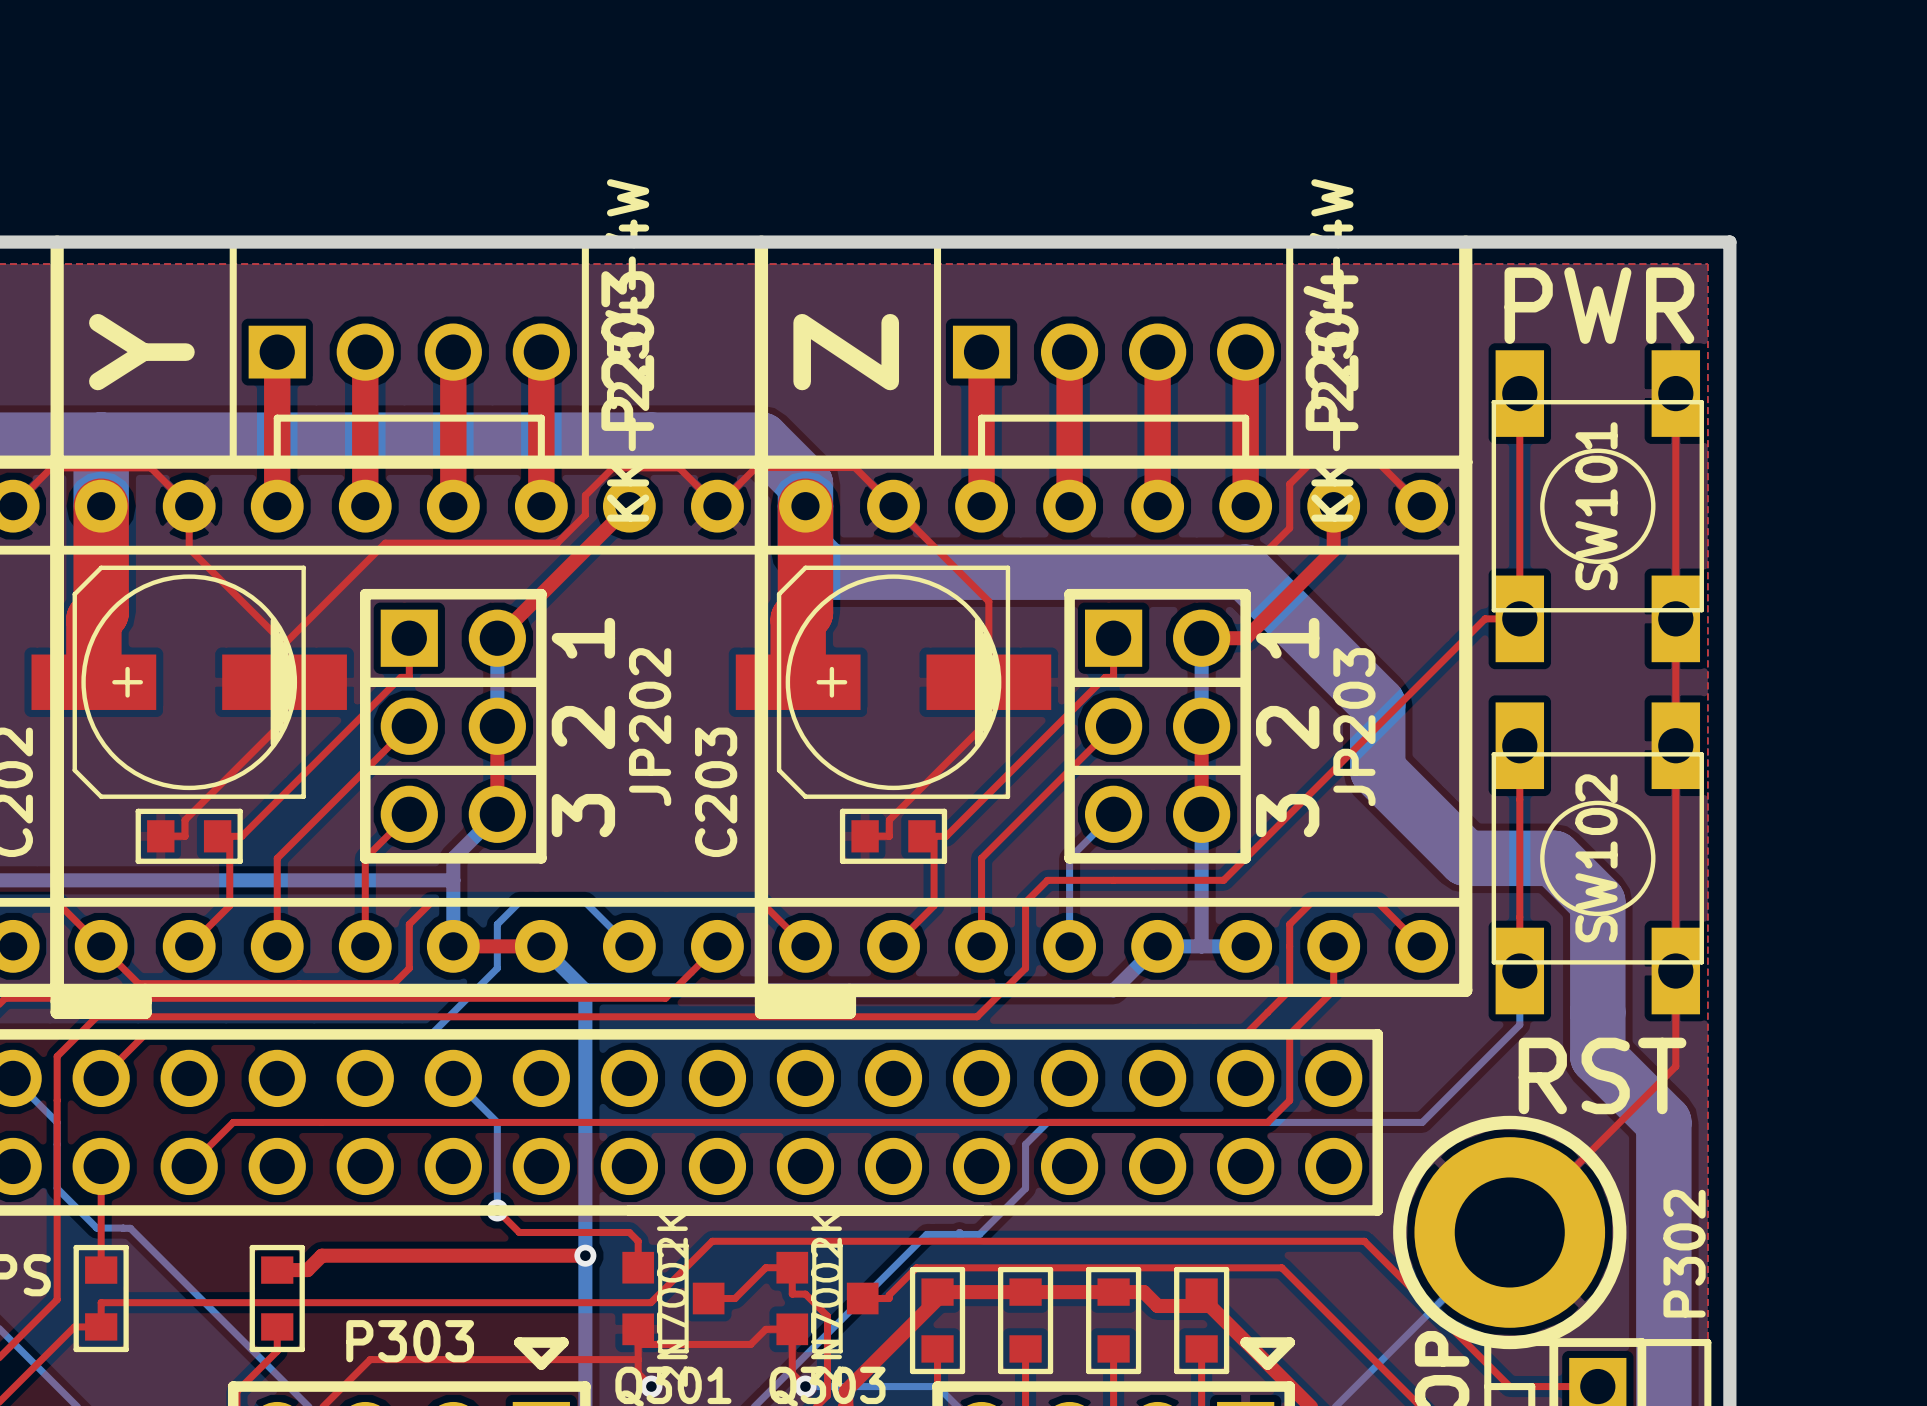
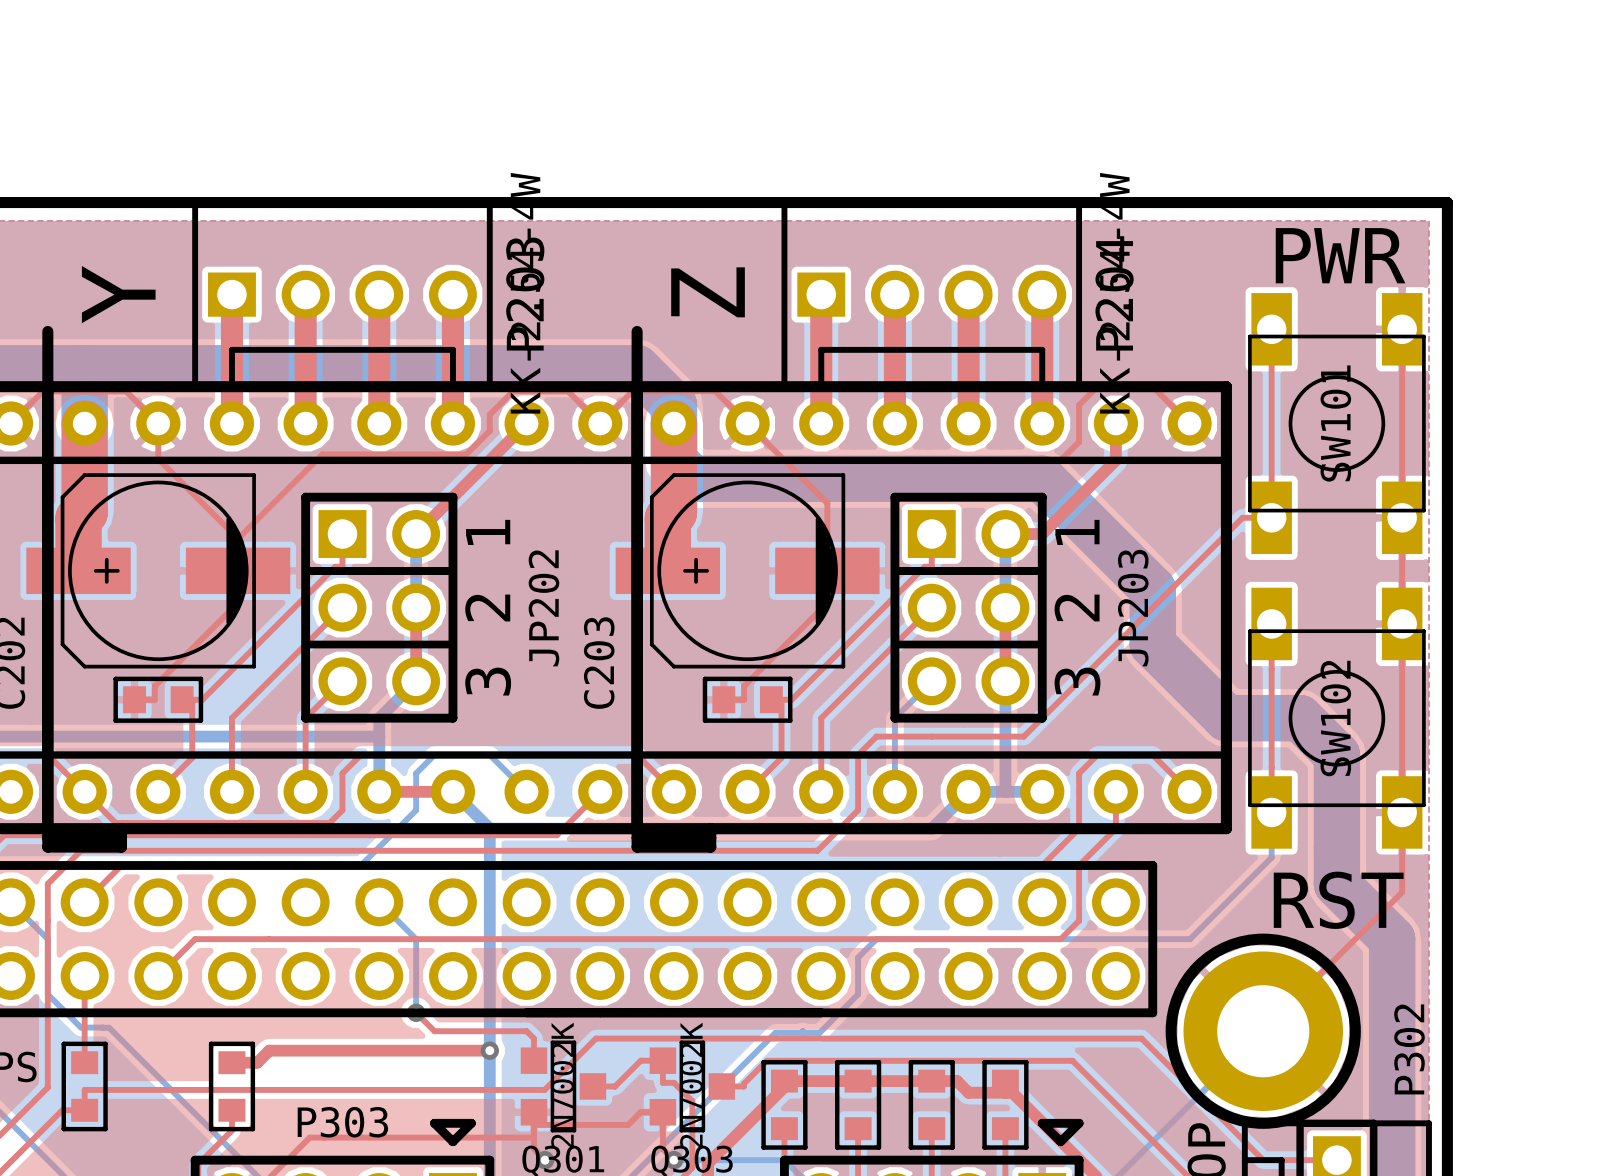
line: (57, 242) (57, 396) -> none
line: (761, 242) (761, 396) -> none
line: (1465, 242) (1465, 462) -> none

